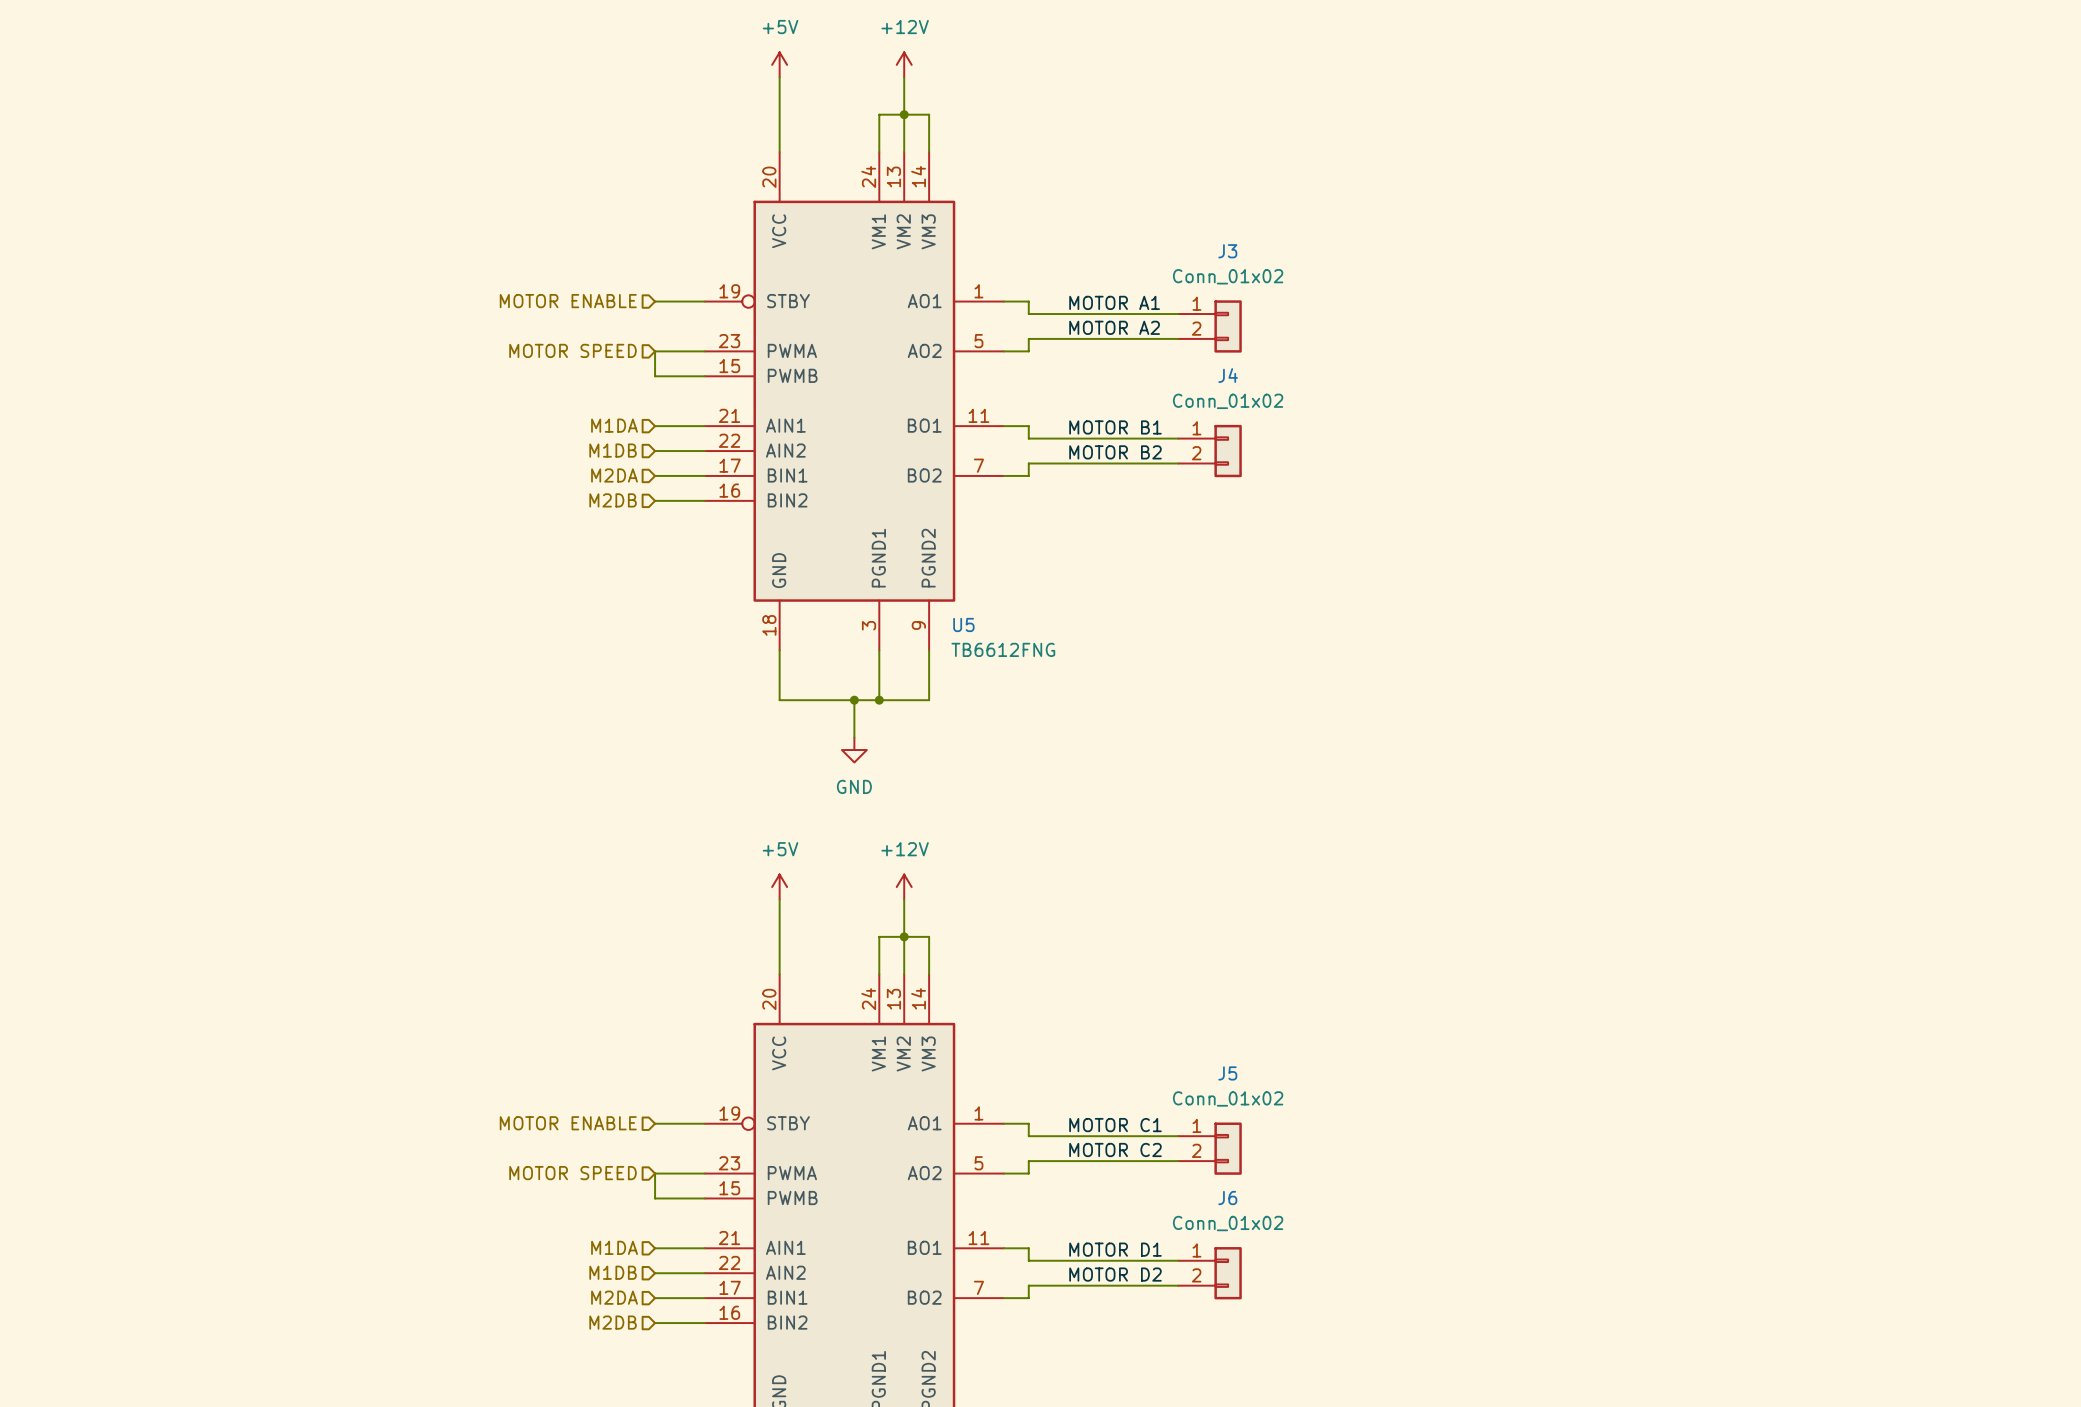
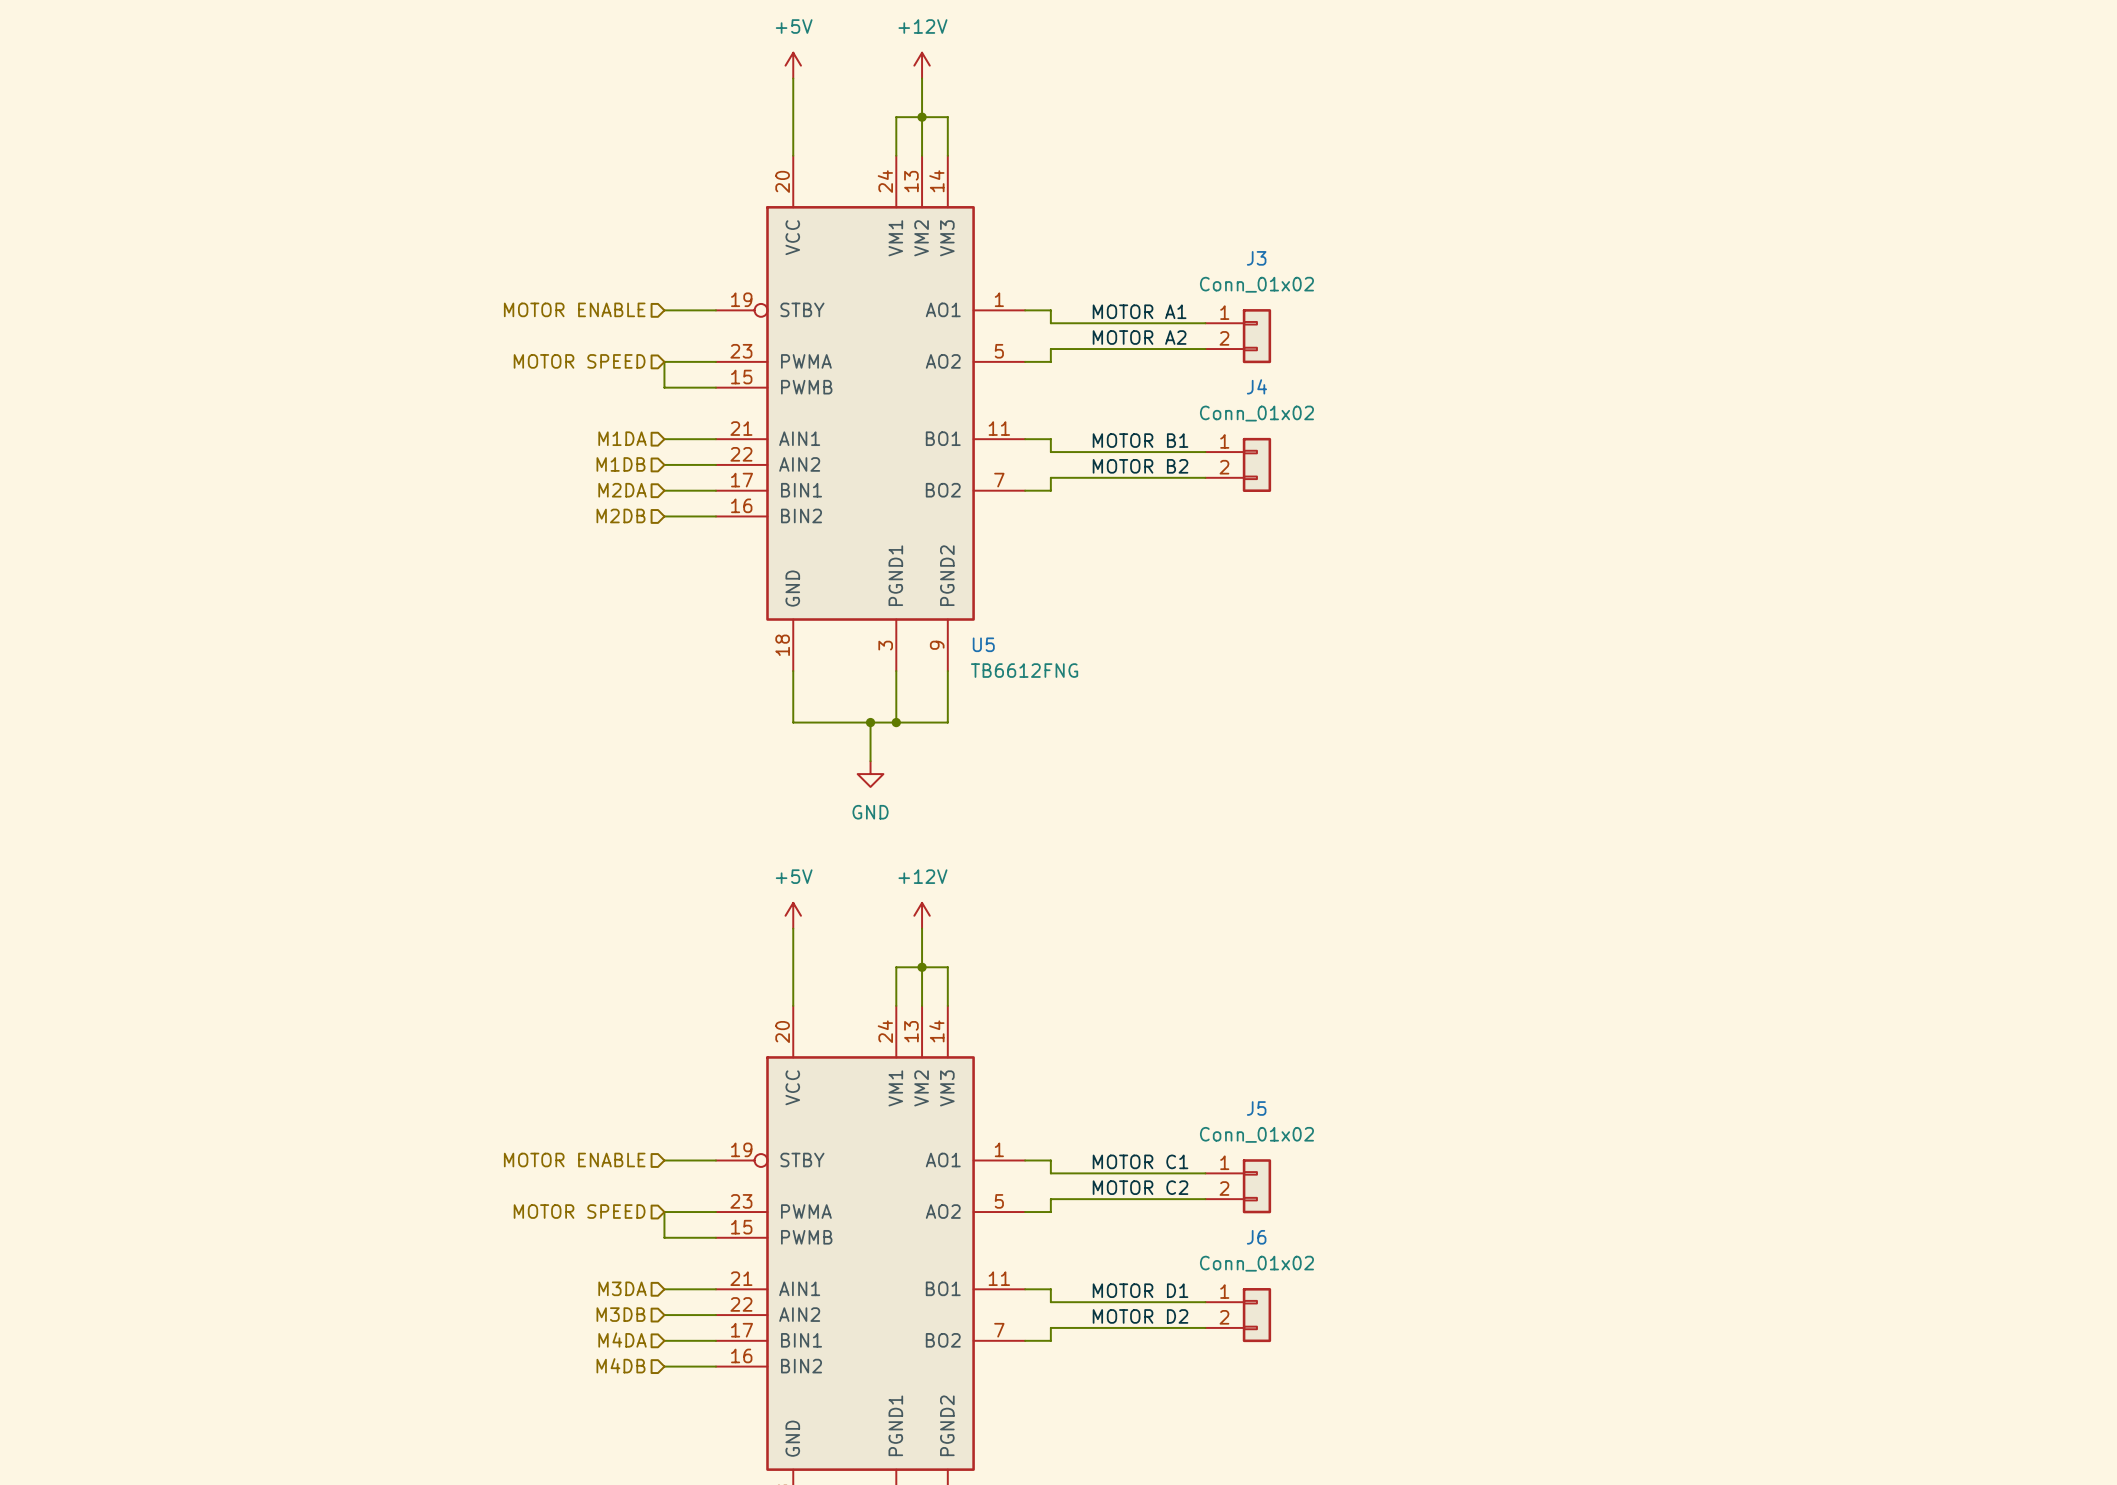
hierarchical label: M1DA (614, 1247) -> M3DA (622, 1288)
hierarchical label: M1DB (613, 1272) -> M3DB (621, 1314)
hierarchical label: M2DA (614, 1297) -> M4DA (622, 1340)
hierarchical label: M2DB (613, 1322) -> M4DB (621, 1365)

